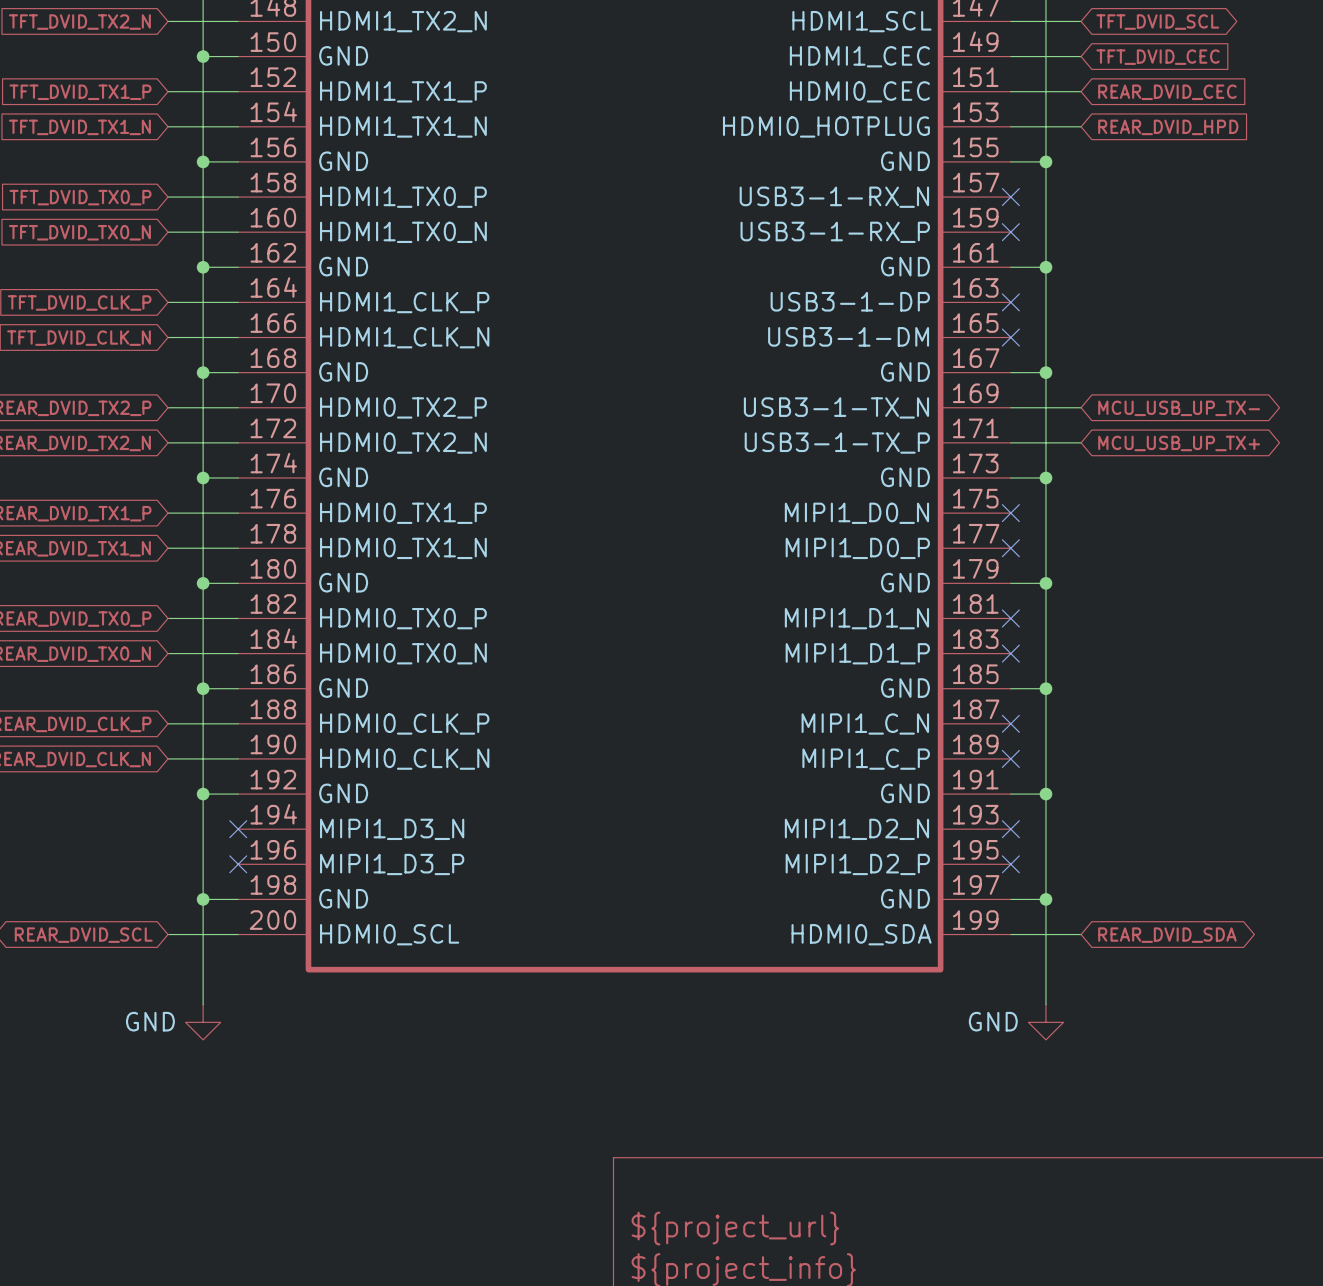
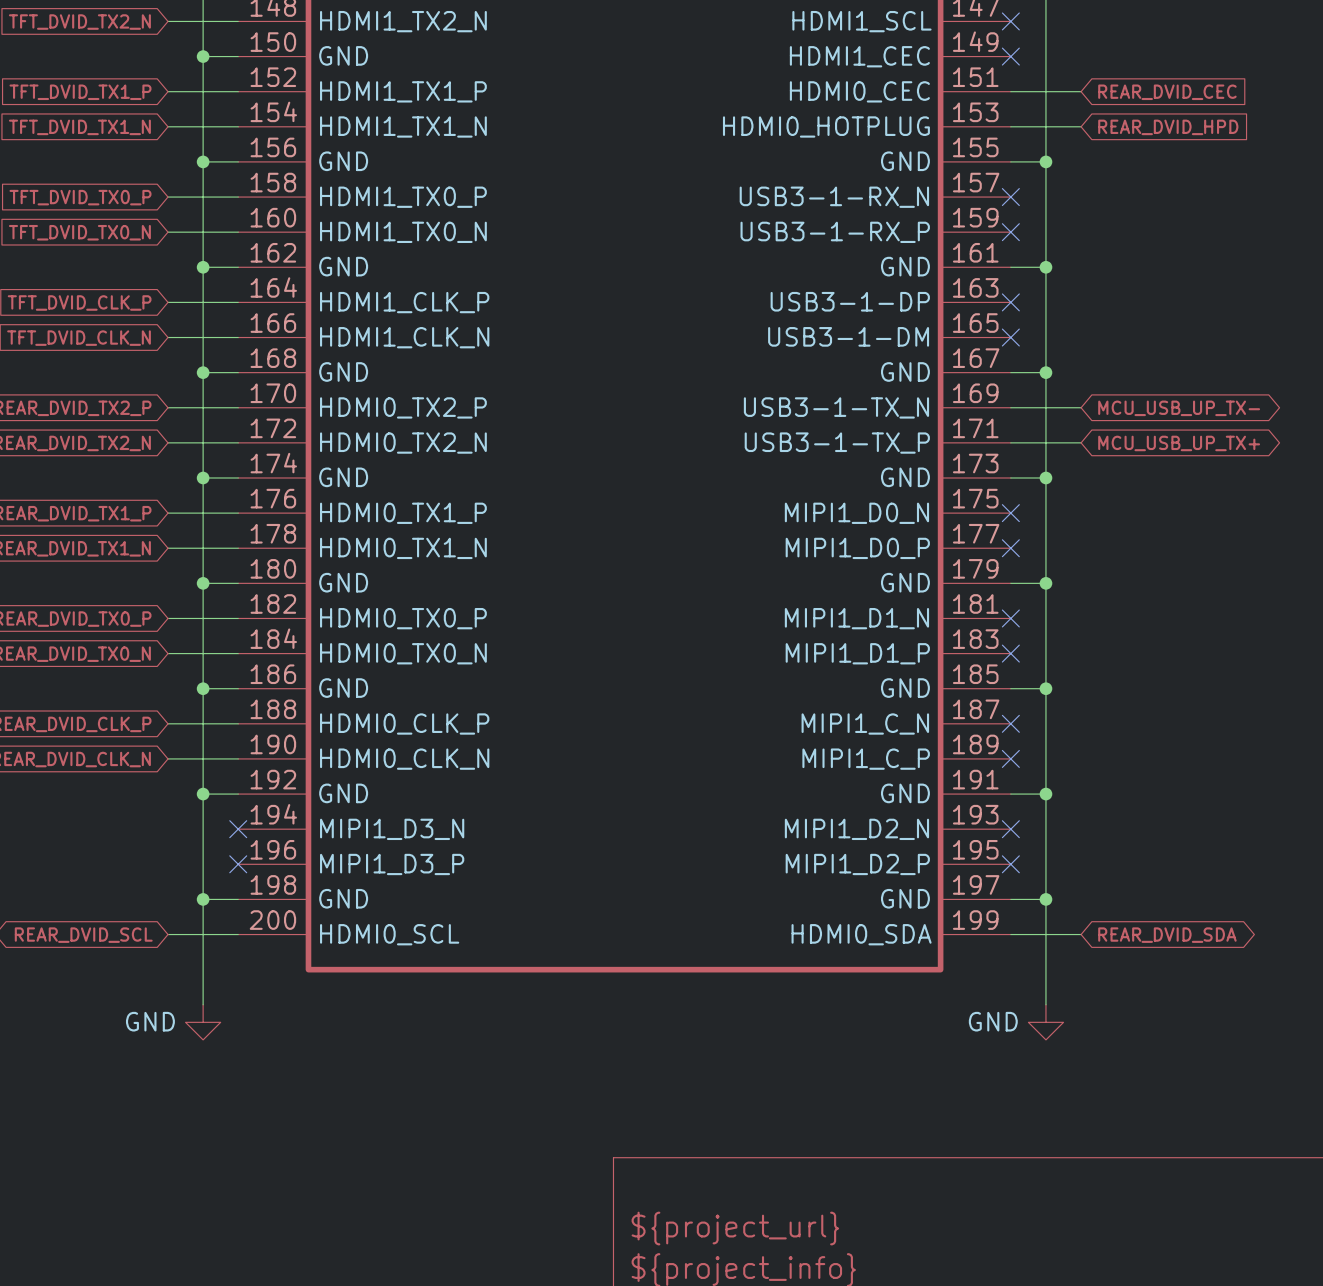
wire: (1010, 21) (1081, 21) -> none
no-connect mark: none -> (1010, 21)
global label: TFT_DVID_SCL (1157, 22) -> none
wire: (1010, 56) (1081, 56) -> none
no-connect mark: none -> (1010, 56)
global label: TFT_DVID_CEC (1158, 57) -> none

